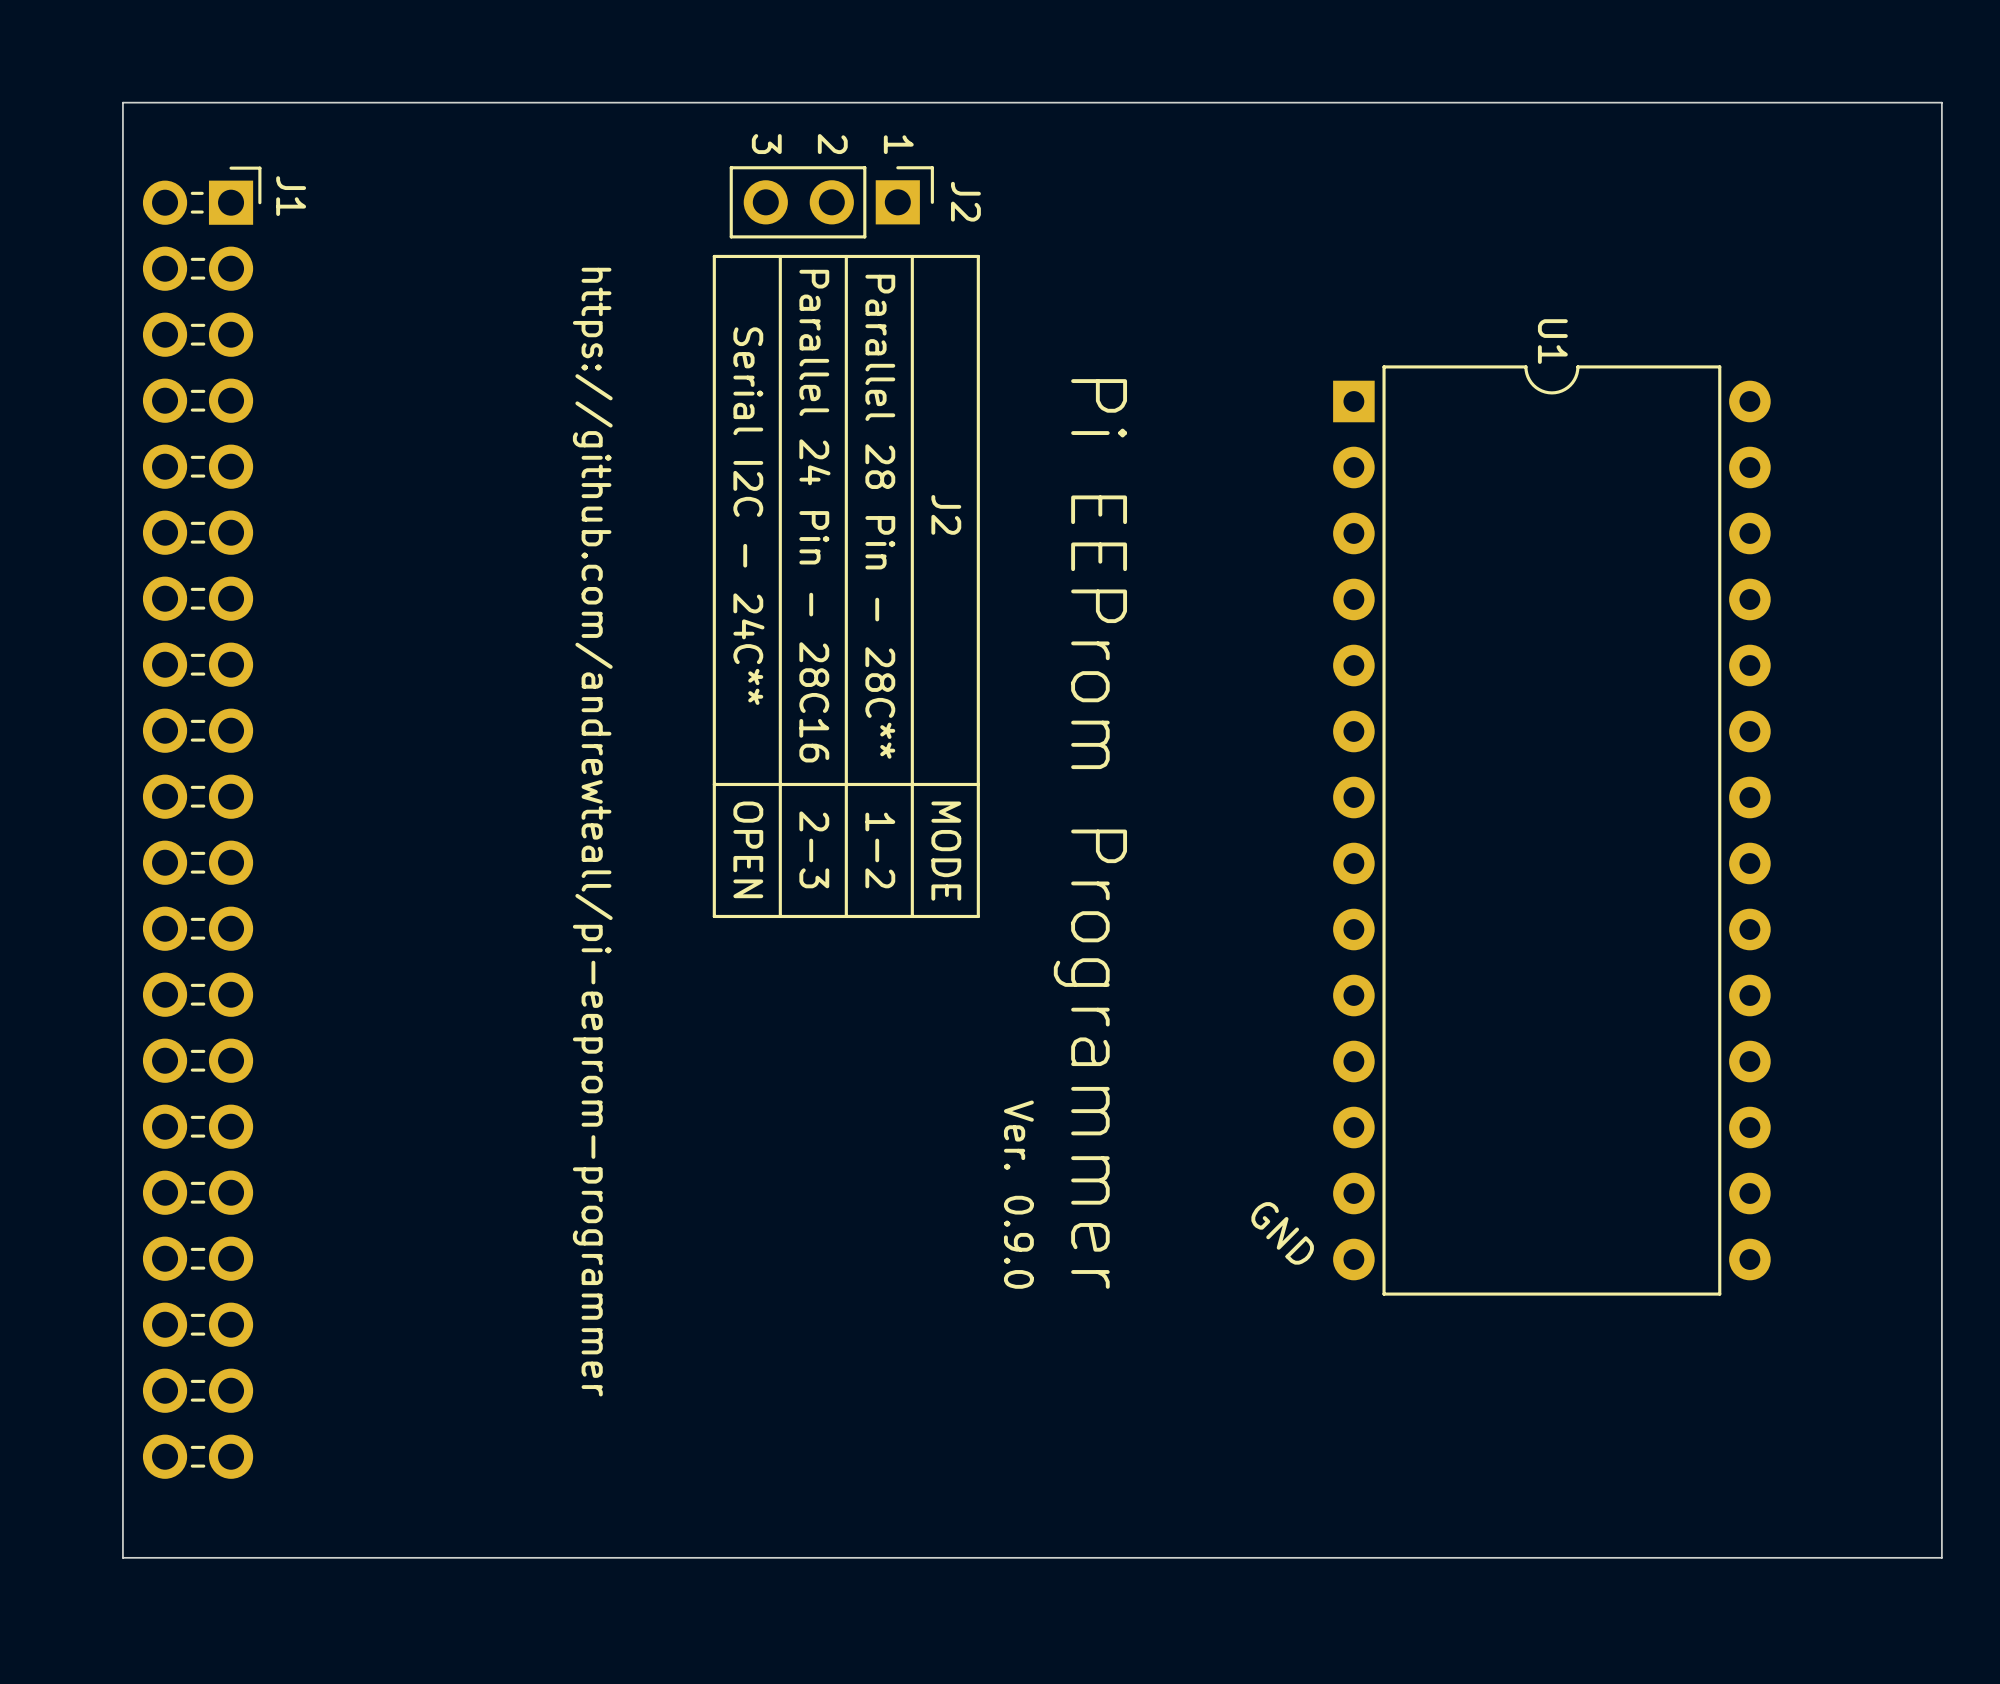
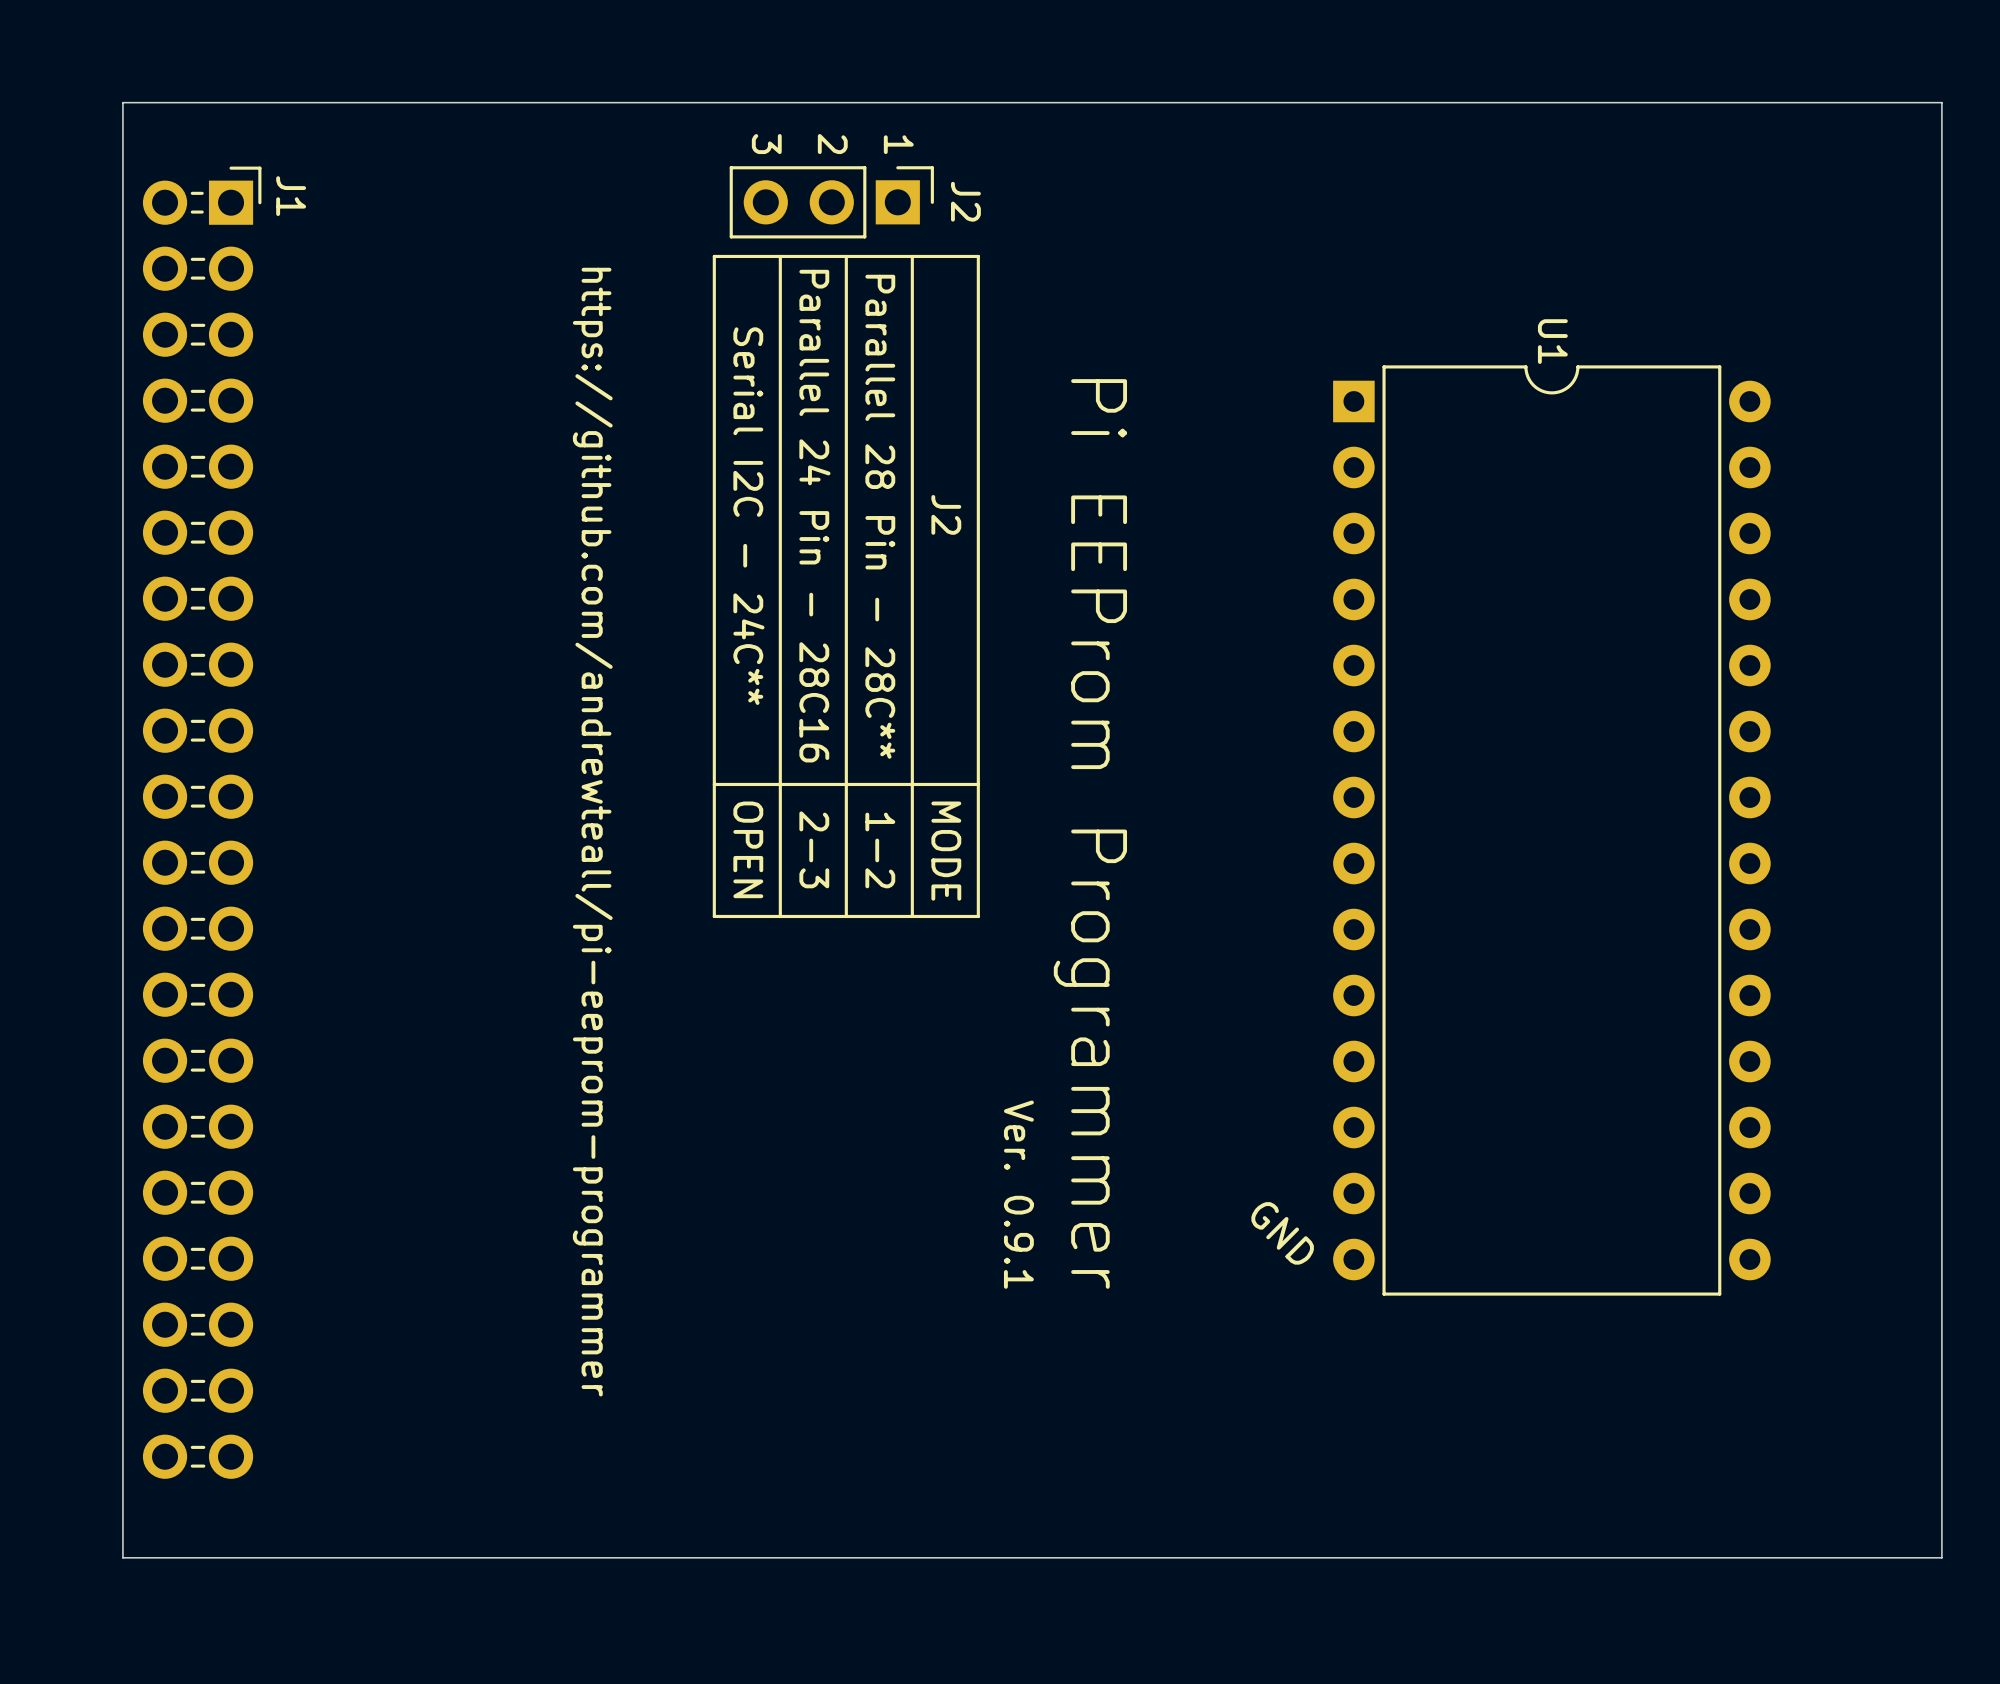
text: Ver. 0.9.0 (1018, 1194) -> Ver. 0.9.1 (1018, 1194)

